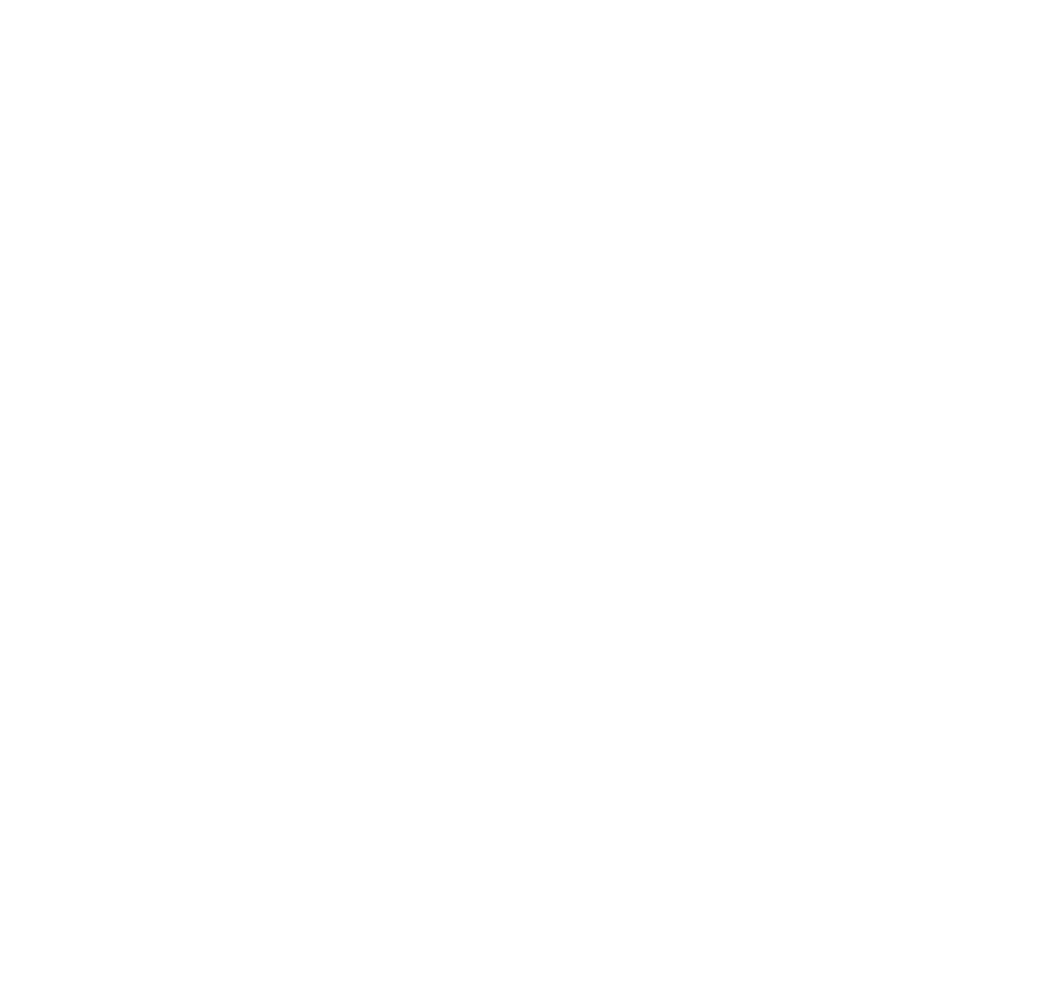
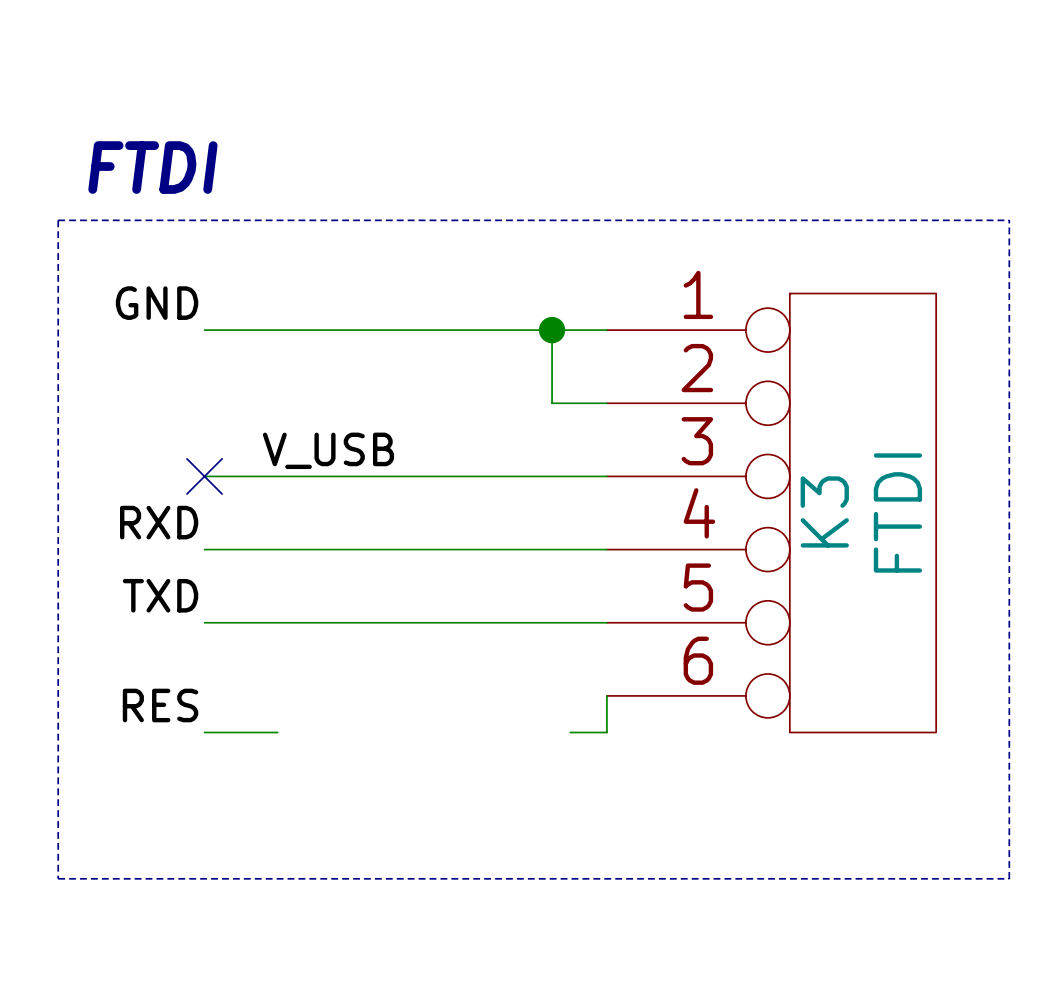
text: none -> FTDI (152, 167)
line: none -> (58, 220) (1009, 220) (1009, 878) (58, 878) (58, 220)
label: none -> GND (157, 303)
wire: none -> (204, 330) (606, 330)
wire: none -> (552, 330) (552, 403) (606, 403)
junction: none -> (552, 330)
label: none -> V_USB (328, 450)
wire: none -> (204, 476) (606, 476)
no-connect mark: none -> (204, 476)
K3: none -> FTDI (771, 513)
label: none -> RXD (159, 522)
wire: none -> (204, 549) (606, 549)
label: none -> TXD (160, 595)
wire: none -> (204, 622) (606, 622)
wire: none -> (606, 695) (606, 732) (570, 732)
label: none -> RES (160, 705)
wire: none -> (204, 732) (277, 732)

